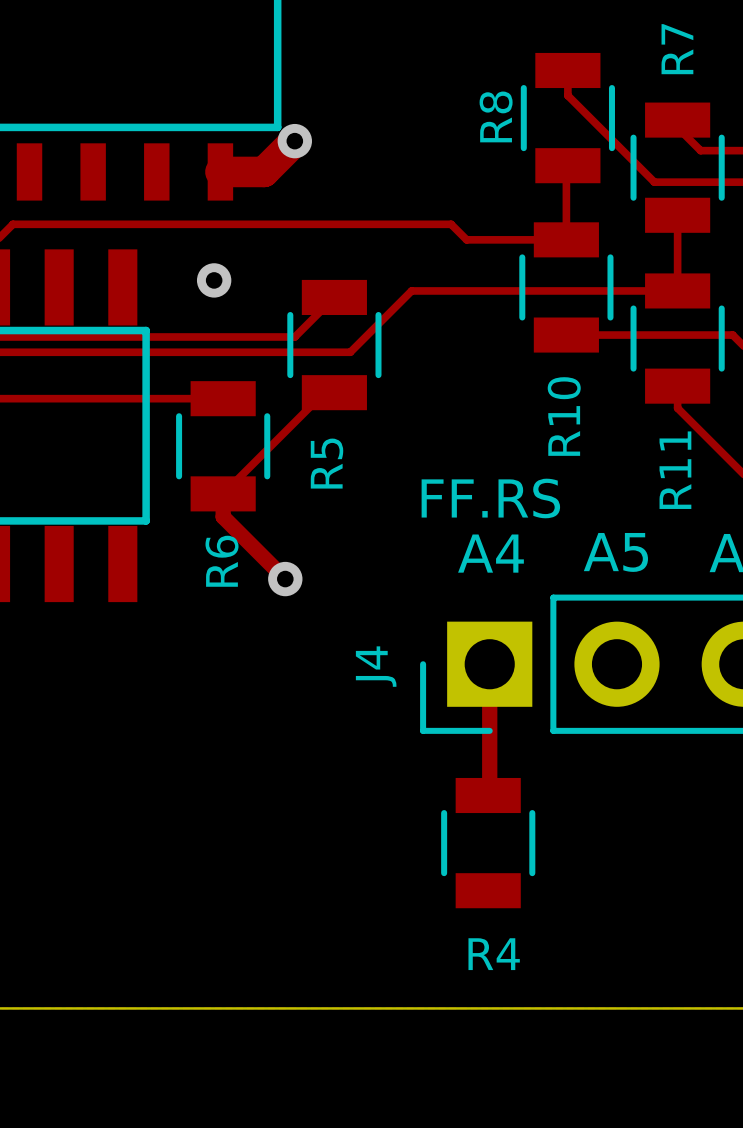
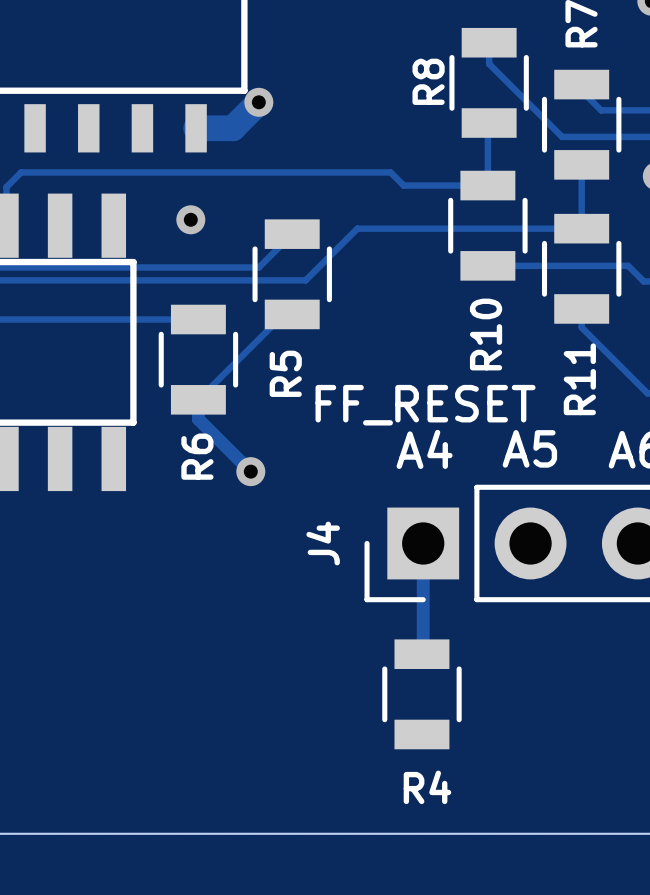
text: FF.RS (490, 498) -> FF_RESET (425, 405)

